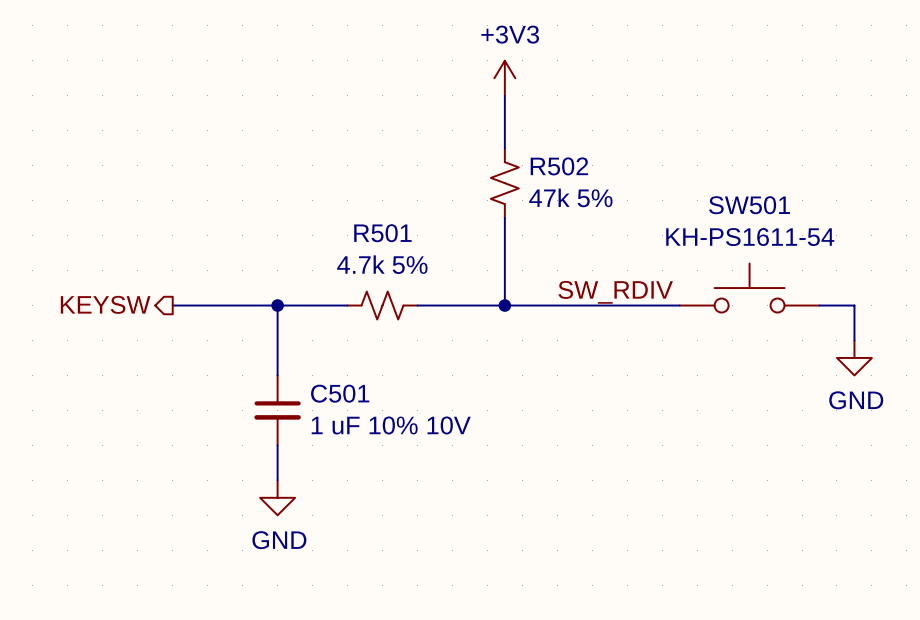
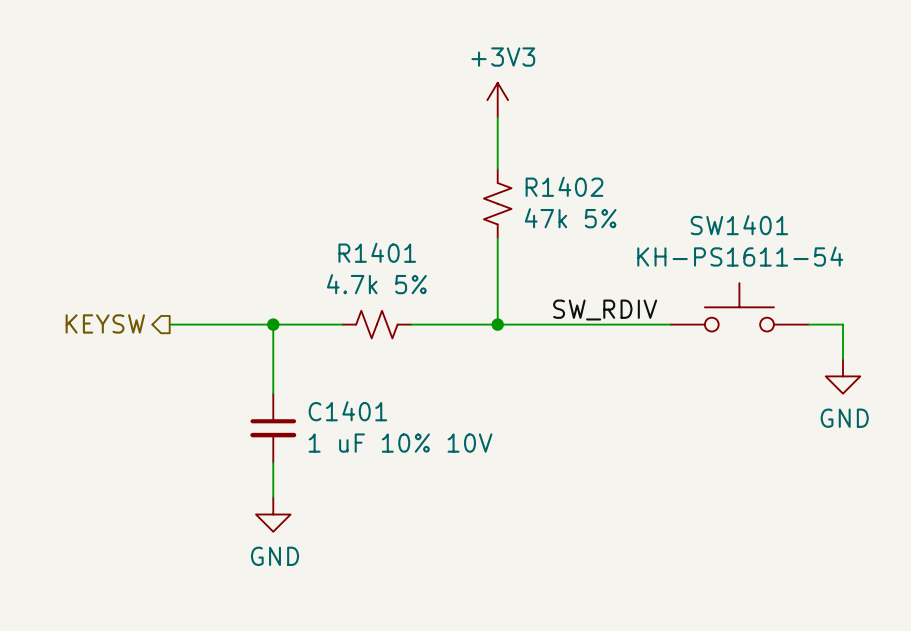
R502 name: R502 (559, 166) -> R1402 (564, 186)
SW501 name: SW501 (749, 205) -> SW1401 (739, 225)
R501 name: R501 (382, 233) -> R1401 (377, 252)
C501 name: C501 (340, 393) -> C1401 (347, 411)

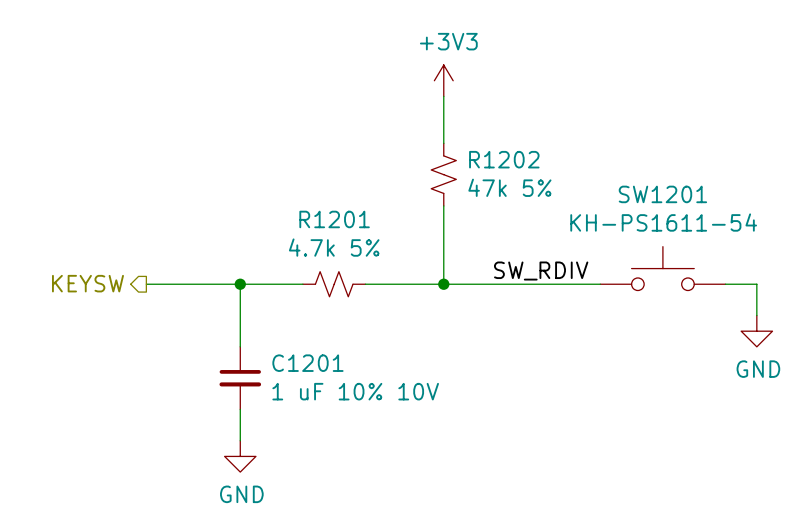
R1402 name: R1402 (564, 186) -> R1202 (504, 159)
SW1401 name: SW1401 (739, 225) -> SW1201 (662, 194)
R1401 name: R1401 (377, 252) -> R1201 (334, 219)
C1401 name: C1401 (347, 411) -> C1201 (307, 363)

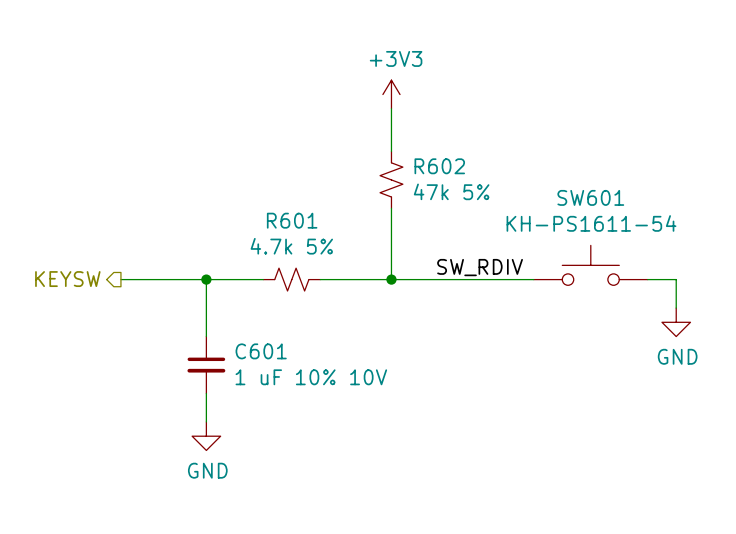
R1202 name: R1202 (504, 159) -> R602 (439, 166)
SW1201 name: SW1201 (662, 194) -> SW601 (590, 197)
R1201 name: R1201 (334, 219) -> R601 (292, 220)
C1201 name: C1201 (307, 363) -> C601 (261, 351)

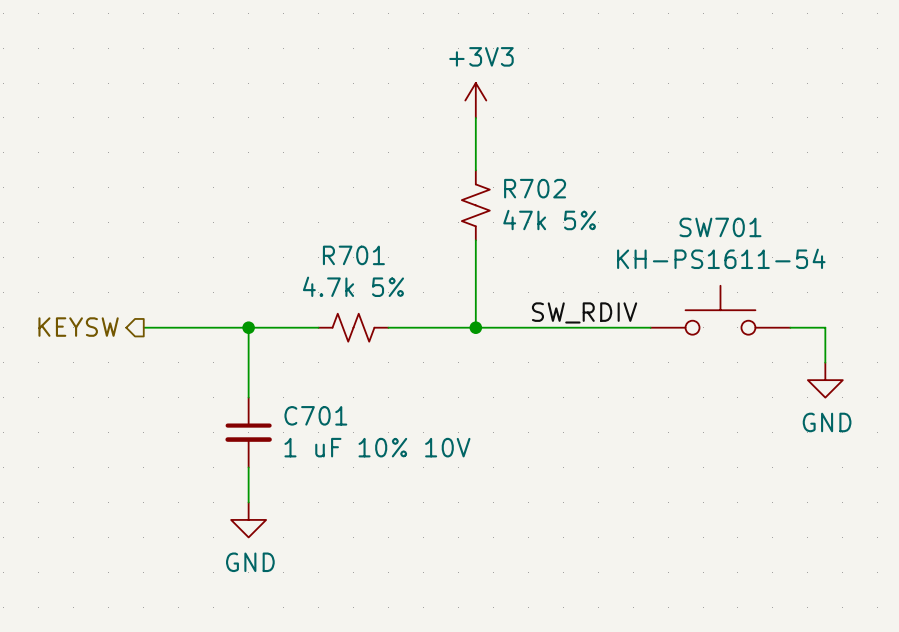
R602 name: R602 (439, 166) -> R702 (535, 188)
SW601 name: SW601 (590, 197) -> SW701 (720, 227)
R601 name: R601 (292, 220) -> R701 (353, 255)
C601 name: C601 (261, 351) -> C701 (315, 415)

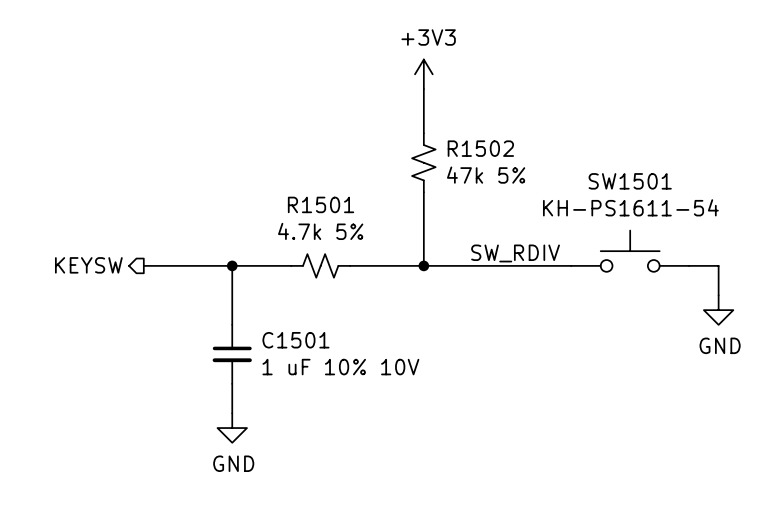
R702 name: R702 (535, 188) -> R1502 (480, 148)
SW701 name: SW701 (720, 227) -> SW1501 (630, 181)
R701 name: R701 (353, 255) -> R1501 (321, 204)
C701 name: C701 (315, 415) -> C1501 (295, 340)

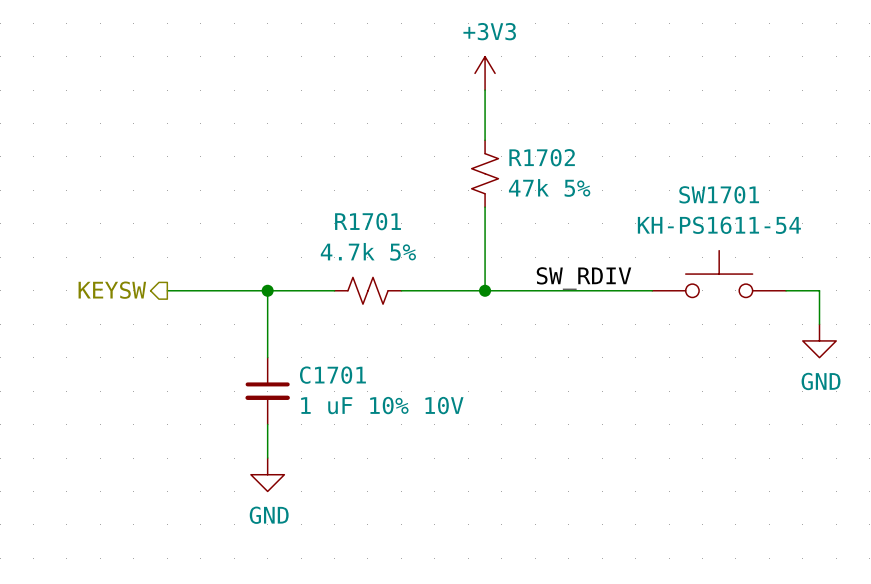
R1502 name: R1502 (480, 148) -> R1702 (542, 157)
SW1501 name: SW1501 (630, 181) -> SW1701 (719, 194)
R1501 name: R1501 (321, 204) -> R1701 (368, 221)
C1501 name: C1501 (295, 340) -> C1701 (332, 375)

